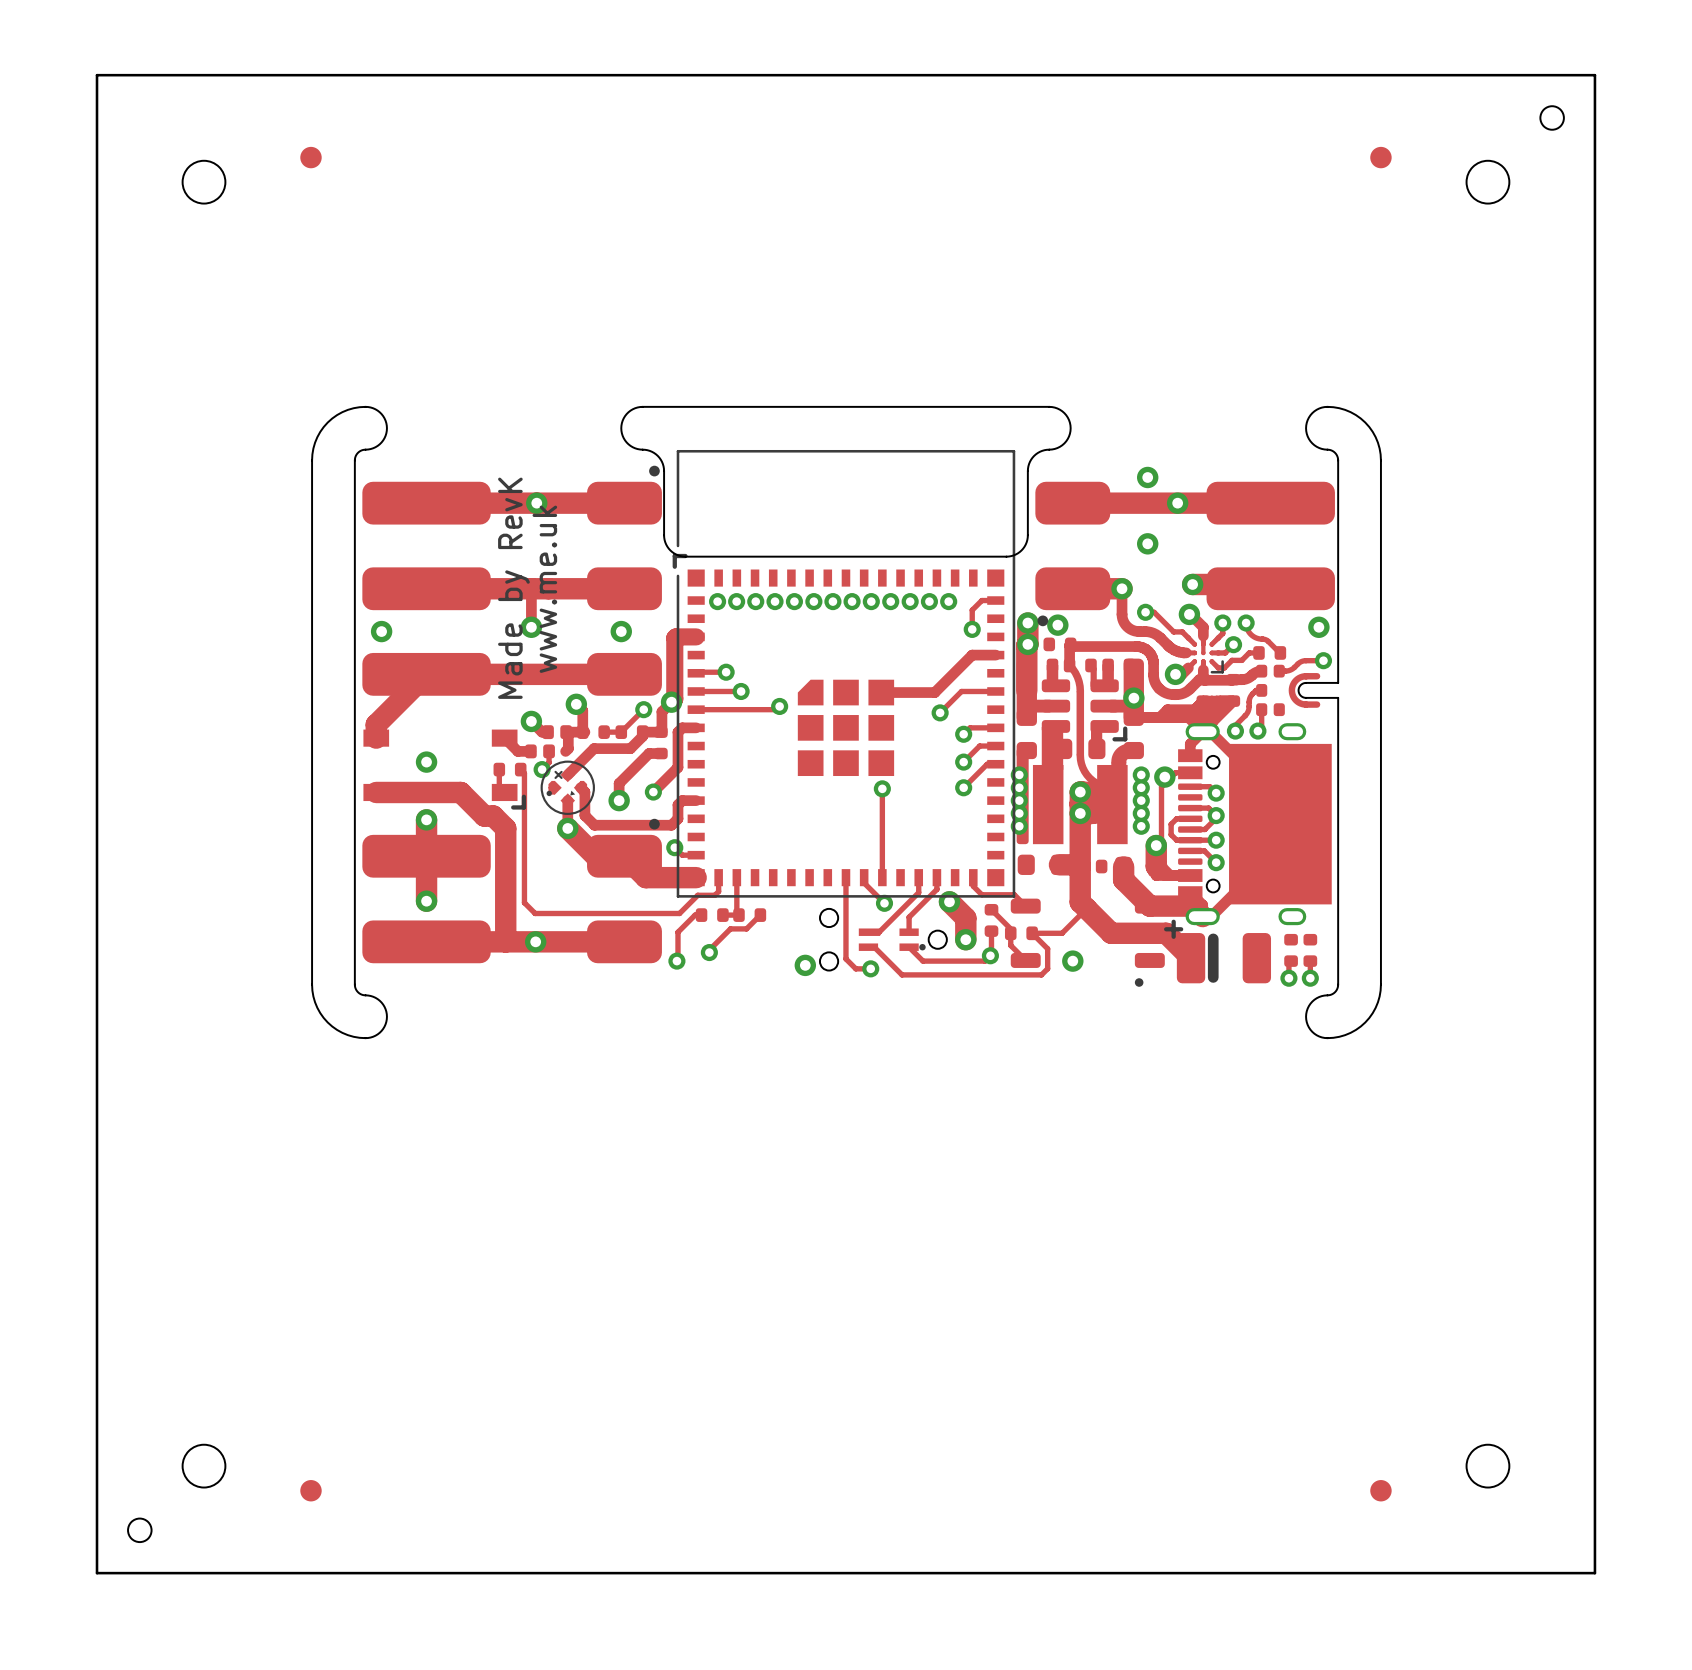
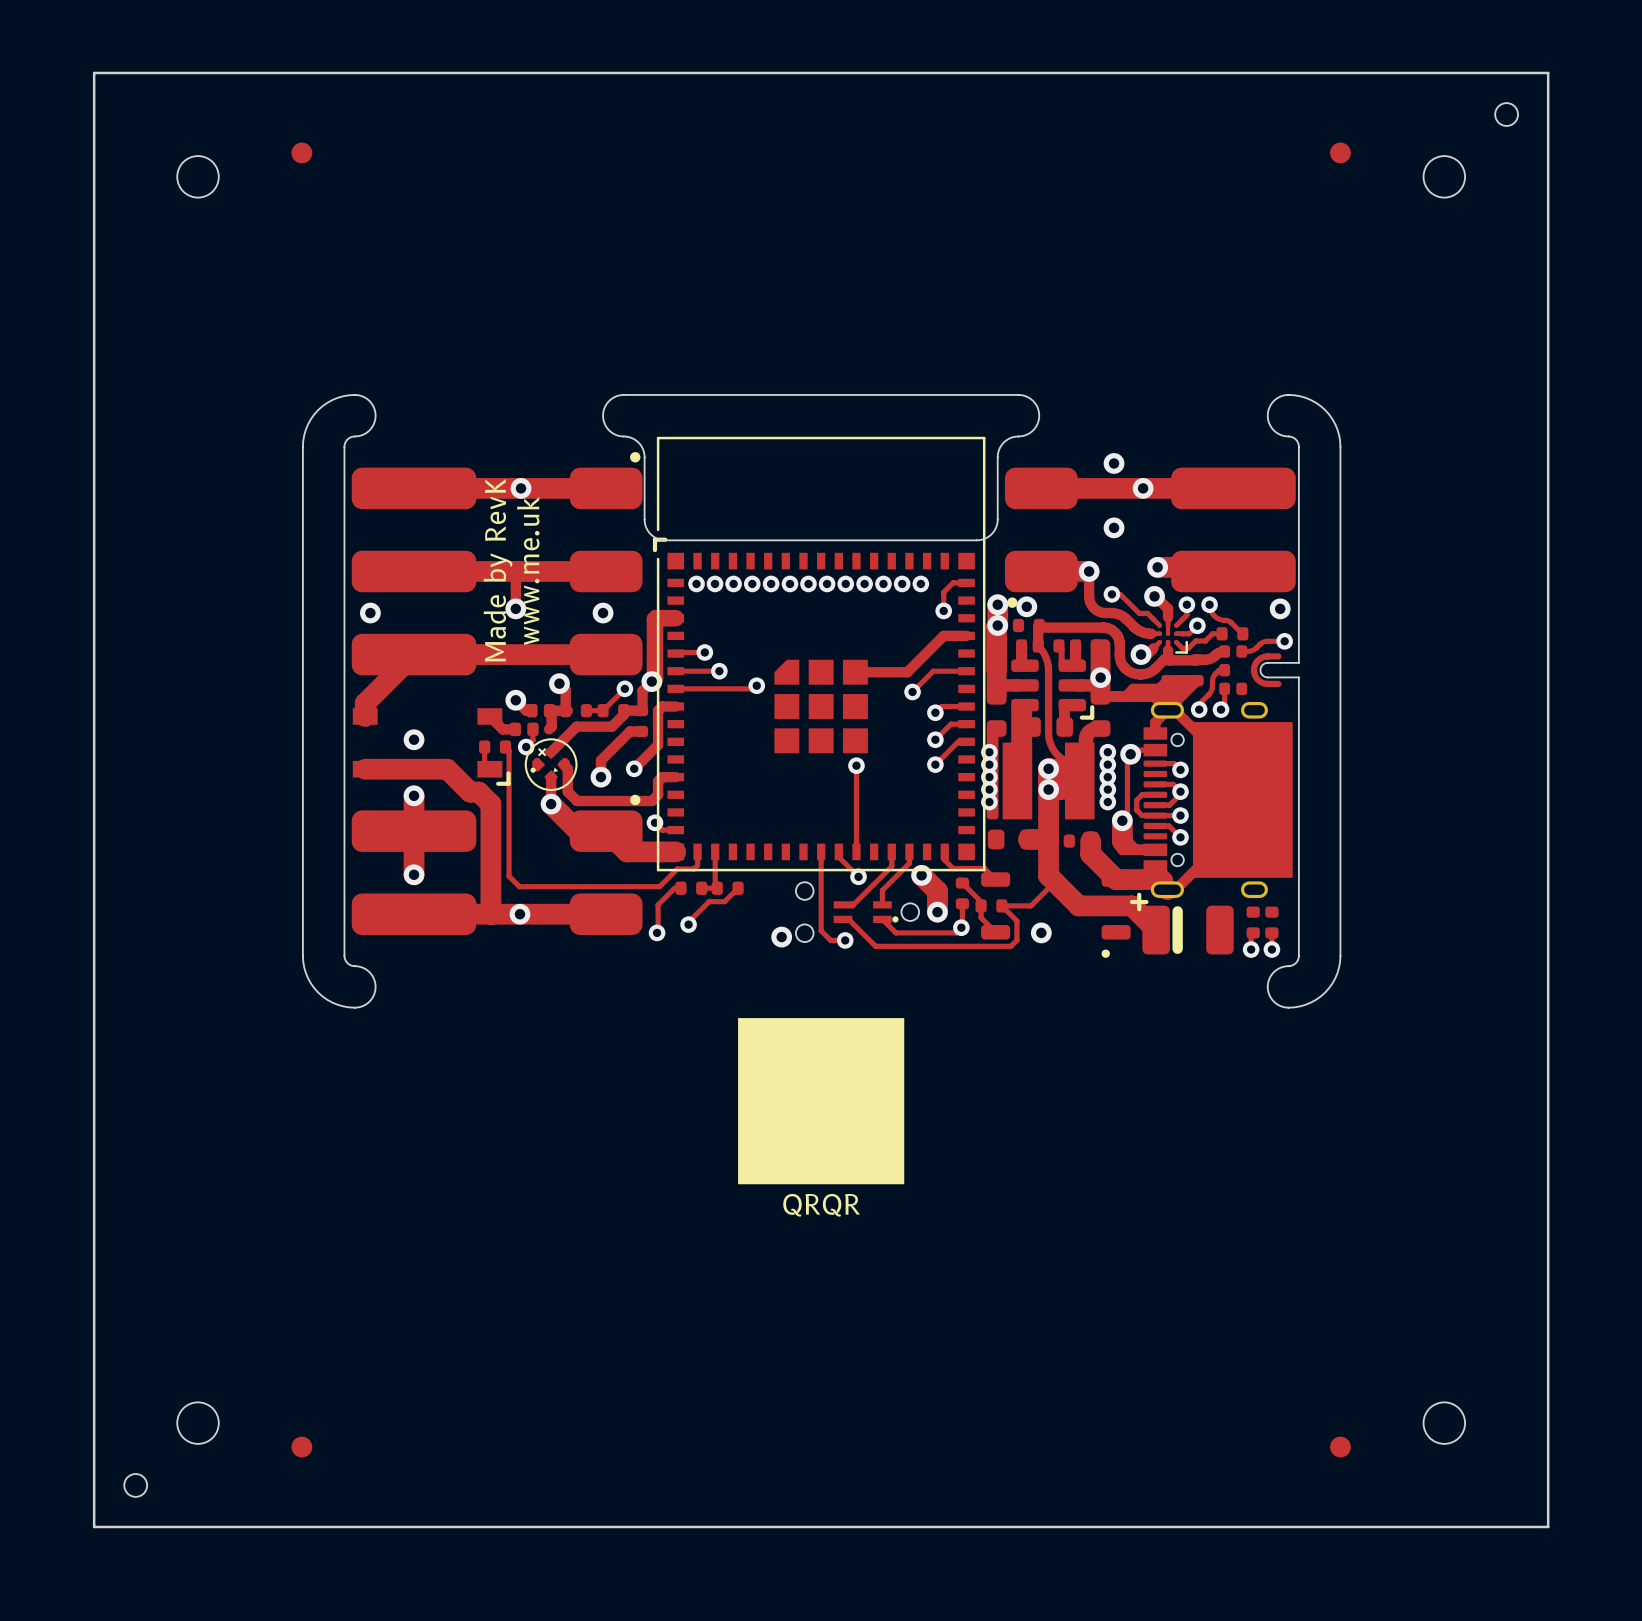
drawing: none -> [738, 1018, 905, 1185]
text: none -> QRQR (821, 1205)

